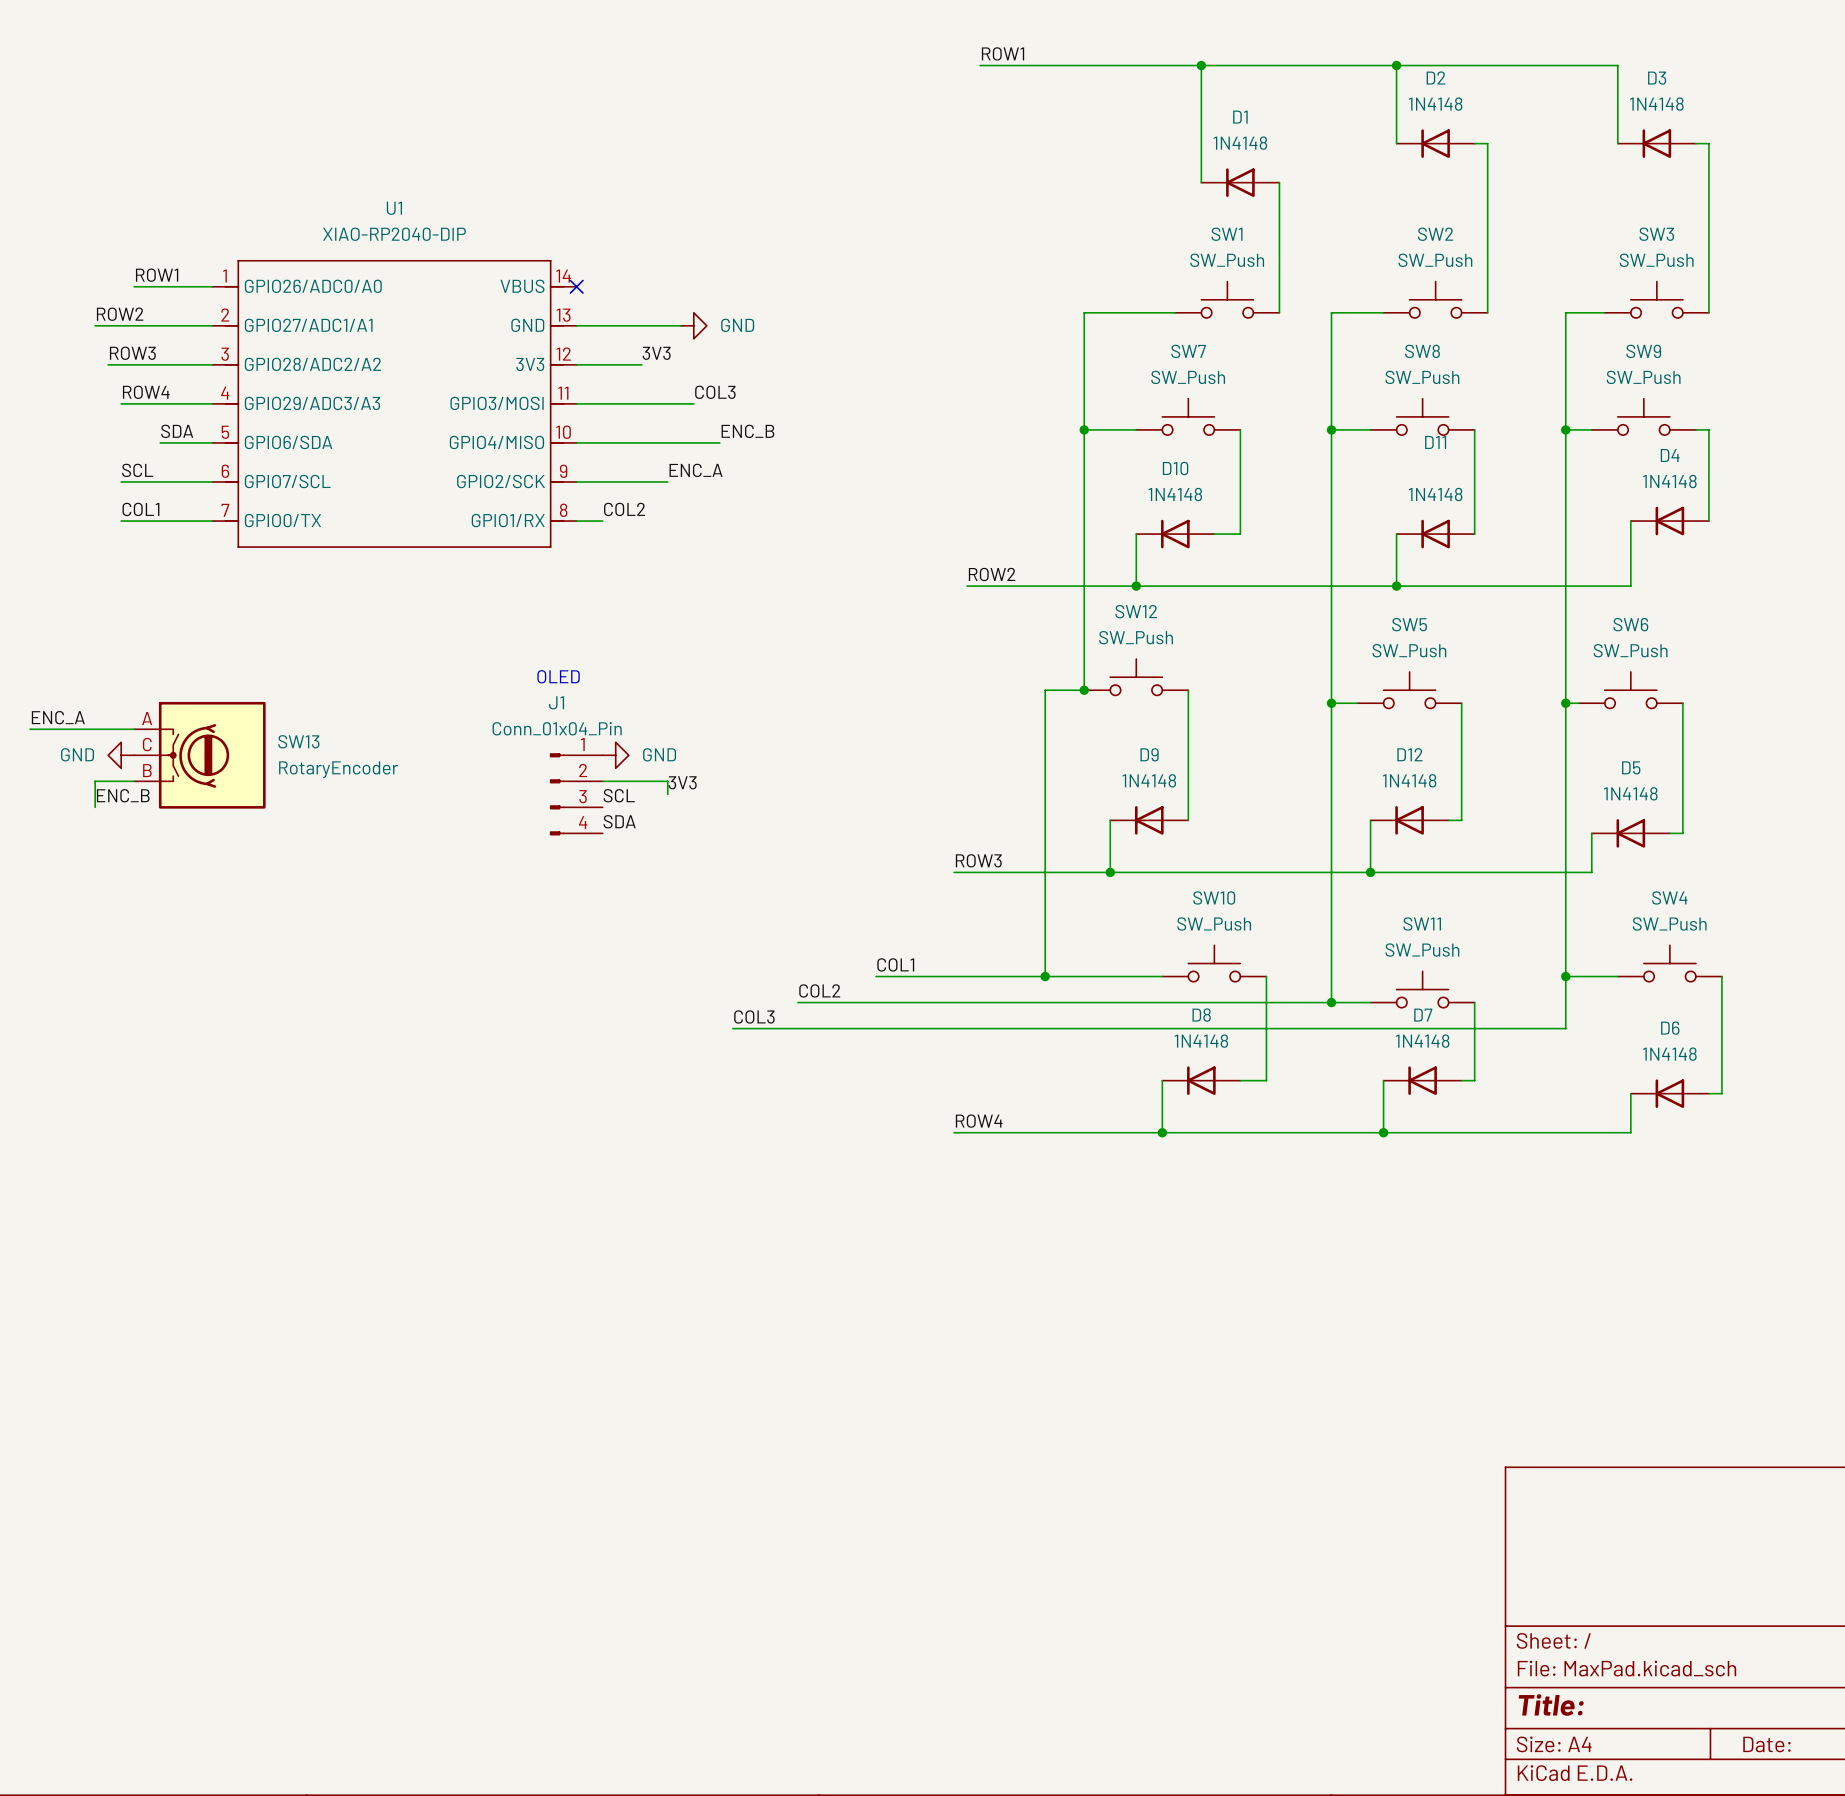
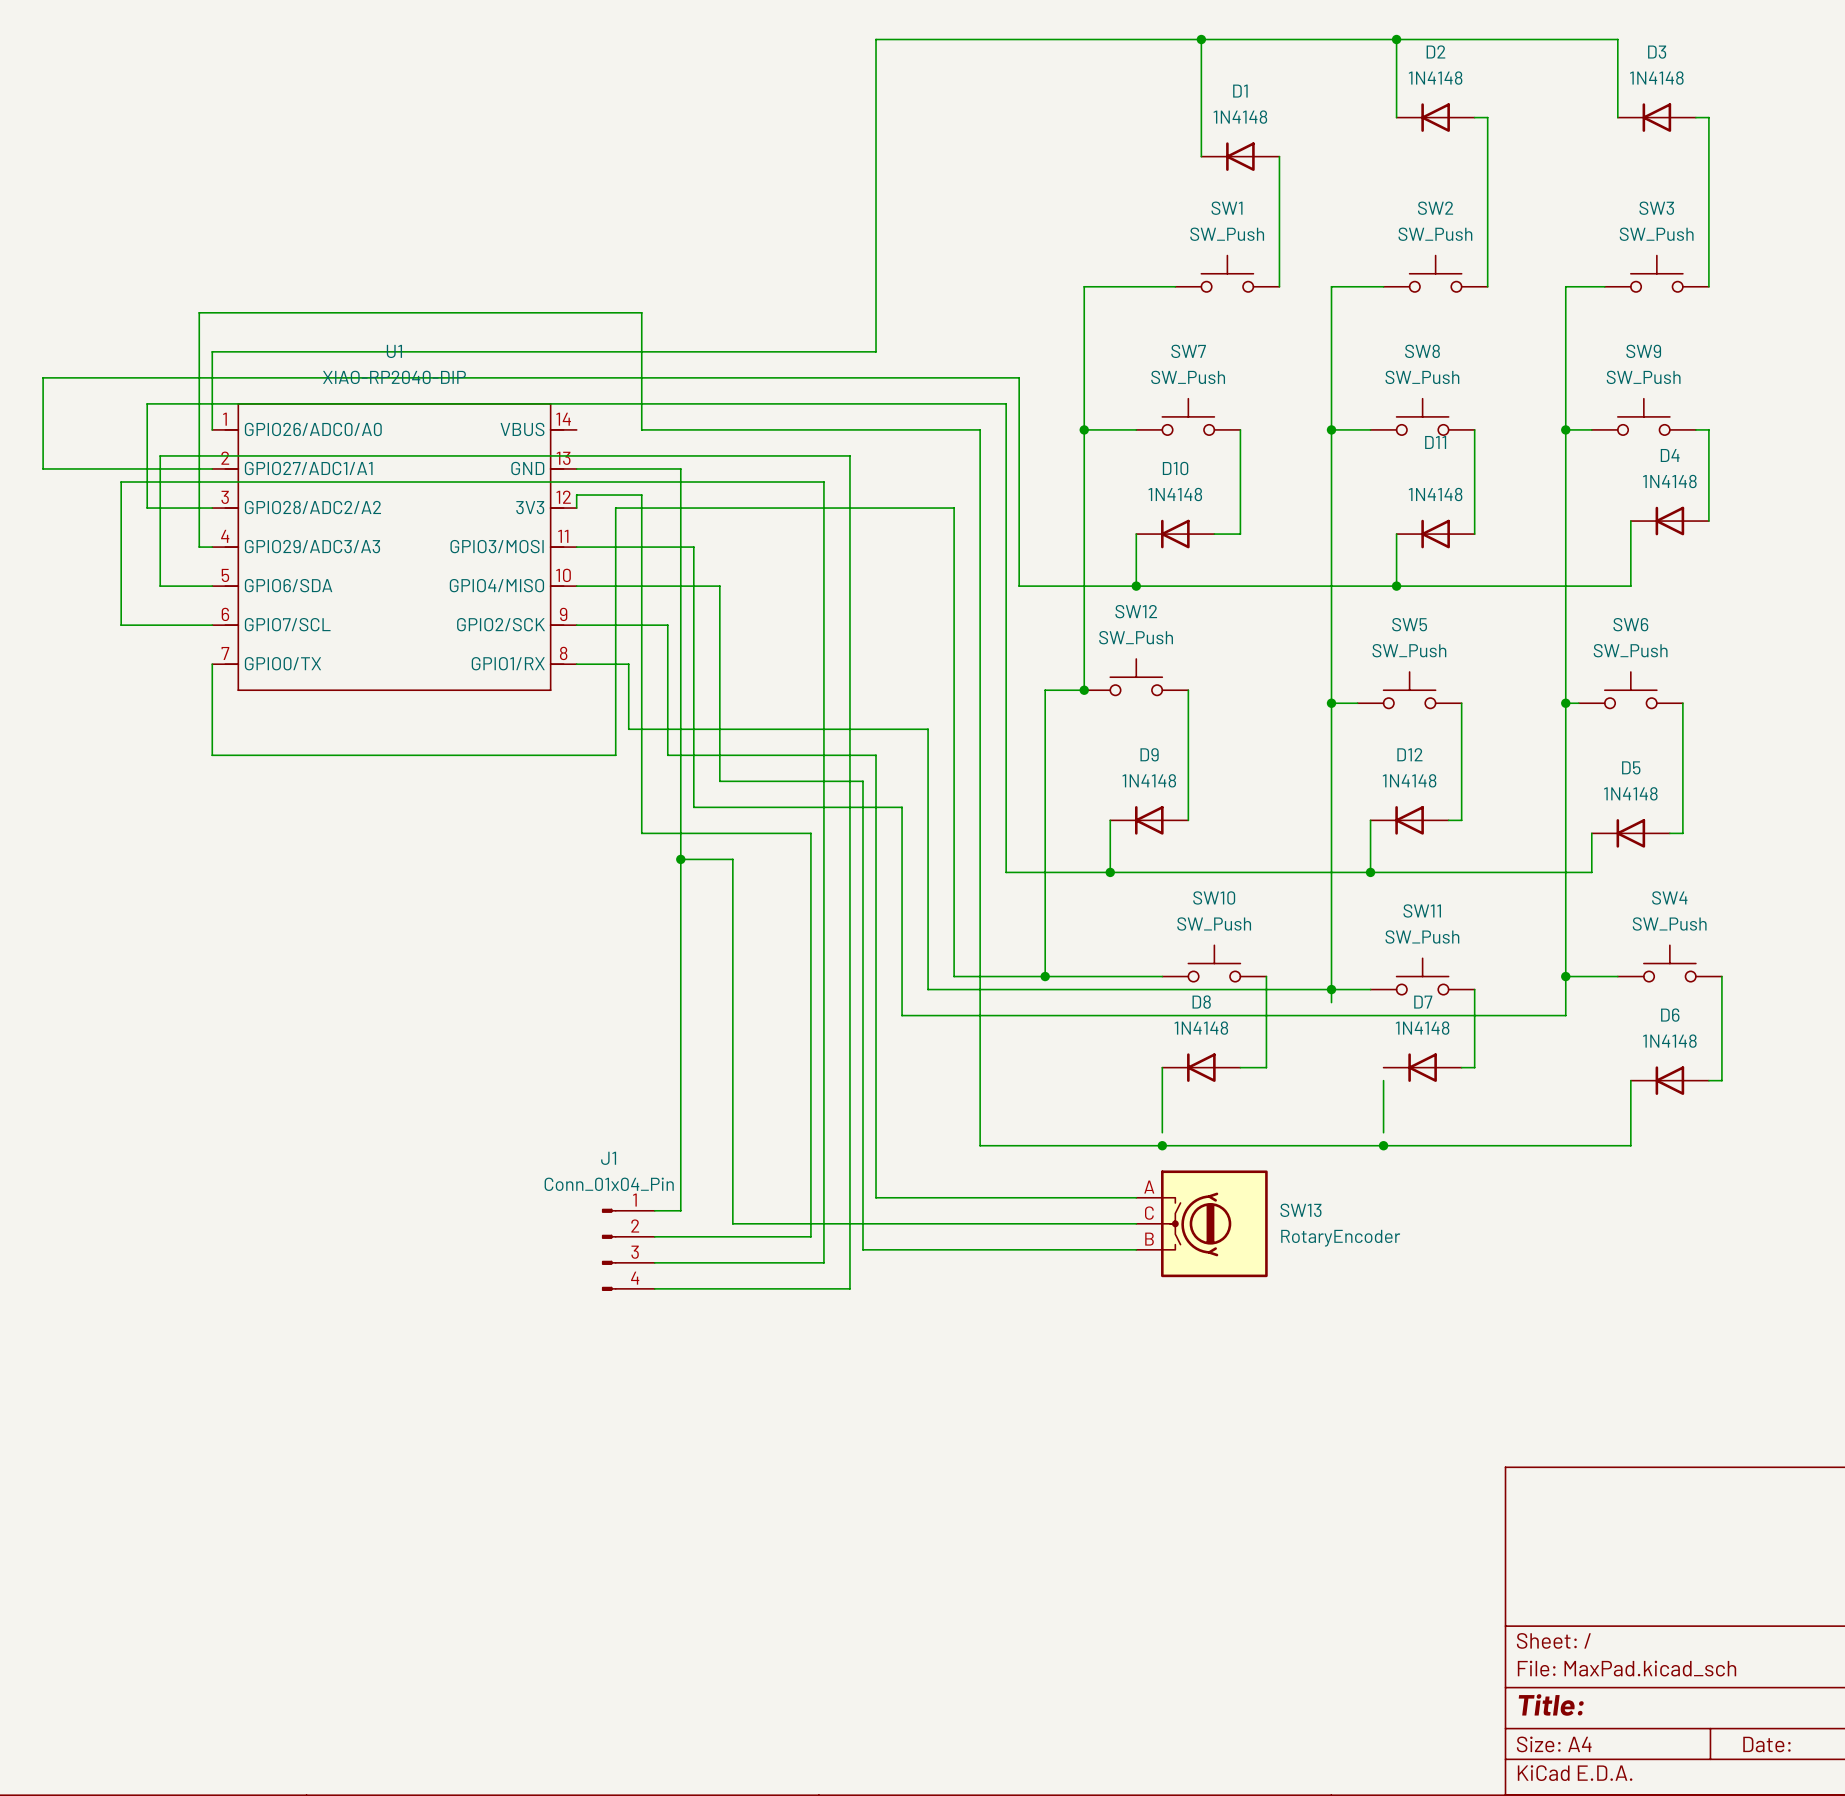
wire: none -> (1201, 39) (1201, 65)
label: ROW1 (1003, 53) -> none
wire: (980, 65) (1617, 65) -> (212, 429) (212, 351) (876, 351) (876, 39) (1617, 39) (1617, 65)
junction position: (1201, 65) -> (1201, 39)
junction position: (1396, 65) -> (1396, 39)
wire: (1396, 117) (1396, 143) -> (1396, 39) (1396, 65)
wire: (1617, 117) (1617, 143) -> none
D2 position: (1435, 143) -> (1435, 117)
wire: (1474, 143) (1487, 143) -> (1474, 117) (1487, 117) (1487, 143)
D3 position: (1656, 143) -> (1656, 117)
wire: (1695, 143) (1708, 143) -> (1695, 117) (1708, 117) (1708, 143)
wire: (1201, 156) (1201, 182) -> (1279, 156) (1279, 182)
D1 position: (1240, 182) -> (1240, 156)
label: ROW1 (157, 275) -> none
wire: (134, 286) (212, 286) -> none
no-connect mark: (576, 286) -> none
wire: (1279, 286) (1279, 312) -> none
wire: (1487, 286) (1487, 312) -> none
wire: (1708, 286) (1708, 312) -> none
SW1 position: (1227, 299) -> (1227, 273)
SW2 position: (1435, 299) -> (1435, 273)
SW3 position: (1656, 299) -> (1656, 273)
wire: (1084, 312) (1175, 312) -> (1084, 312) (1084, 286) (1175, 286)
wire: (1331, 312) (1383, 312) -> (1331, 312) (1331, 286) (1383, 286)
wire: (1565, 312) (1604, 312) -> (1565, 312) (1565, 286) (1604, 286)
label: ROW2 (120, 314) -> none
wire: (95, 325) (212, 325) -> none
wire: (576, 325) (680, 325) -> none
power symbol: GND (693, 325) -> none
label: ROW3 (132, 353) -> none
label: 3V3 (656, 353) -> none
wire: (108, 364) (212, 364) -> none
wire: (576, 364) (641, 364) -> none
label: ROW4 (146, 392) -> none
label: COL3 (715, 392) -> none
wire: (121, 403) (147, 403) -> (212, 508) (147, 508) (147, 403)
wire: none -> (212, 403) (576, 403)
U1 position: (394, 403) -> (394, 547)
label: SDA (177, 431) -> none
label: ENC_B (747, 431) -> none
wire: (160, 442) (212, 442) -> none
wire: (576, 442) (719, 442) -> none
wire: none -> (576, 468) (680, 468) (680, 1210) (654, 1210)
label: SCL (137, 470) -> none
label: ENC_A (696, 470) -> none
wire: none -> (121, 481) (121, 625) (212, 625)
wire: none -> (212, 481) (576, 481)
wire: none -> (667, 481) (823, 481) (823, 1262) (654, 1262)
wire: none -> (576, 508) (576, 495) (641, 495) (641, 833) (810, 833) (810, 1236) (654, 1236)
label: COL1 (140, 509) -> none
label: COL2 (624, 509) -> none
wire: (121, 521) (212, 521) -> none
wire: (576, 521) (602, 521) -> none
label: ROW2 (992, 574) -> none
wire: none -> (212, 586) (160, 586) (160, 455) (849, 455) (849, 1288) (654, 1288)
wire: none -> (576, 586) (719, 586) (719, 781) (862, 781) (862, 1249) (1136, 1249)
wire: (967, 586) (1019, 586) -> (212, 468) (43, 468) (43, 377) (1019, 377) (1019, 586)
wire: none -> (576, 625) (667, 625) (667, 755) (876, 755) (876, 1197) (1136, 1197)
wire: none -> (576, 664) (628, 664) (628, 729) (928, 729) (928, 989) (1370, 989)
text: OLED (558, 676) -> none
label: ENC_A (58, 717) -> none
wire: (30, 729) (134, 729) -> none
power symbol: GND (121, 755) -> none
SW13 position: (199, 755) -> (1202, 1223)
power symbol: GND (615, 755) -> none
wire: (134, 781) (95, 781) (95, 807) -> none
wire: (602, 781) (667, 781) (667, 794) -> none
label: 3V3 (682, 782) -> none
J1 position: (576, 794) -> (628, 1249)
label: ENC_B (123, 795) -> none
label: SCL (619, 795) -> none
label: SDA (619, 821) -> none
wire: none -> (680, 859) (732, 859) (732, 1223) (1136, 1223)
junction: none -> (680, 859)
label: ROW3 (978, 860) -> none
wire: (954, 872) (1006, 872) -> (693, 403) (1006, 403) (1006, 872)
label: COL1 (895, 964) -> none
wire: (876, 976) (954, 976) -> (212, 664) (212, 755) (615, 755) (615, 508) (954, 508) (954, 976)
SW11 position: (1422, 989) -> (1422, 976)
wire: none -> (1474, 989) (1474, 1002)
label: COL2 (819, 990) -> none
wire: (797, 1002) (1370, 1002) -> none
junction position: (1331, 1002) -> (1331, 989)
wire: (1565, 1015) (1565, 1028) (732, 1028) -> (1565, 1015) (902, 1015) (902, 807) (693, 807) (693, 547) (576, 547)
label: COL3 (754, 1016) -> none
wire: none -> (1162, 1067) (1162, 1080)
wire: (1266, 1067) (1266, 1080) (1240, 1080) -> (1266, 1067) (1240, 1067)
wire: (1474, 1067) (1474, 1080) (1461, 1080) -> (1474, 1067) (1461, 1067)
D8 position: (1201, 1080) -> (1201, 1067)
D7 position: (1422, 1080) -> (1422, 1067)
wire: none -> (1630, 1080) (1630, 1093)
wire: (1721, 1080) (1721, 1093) (1708, 1093) -> (1721, 1080) (1708, 1080)
D6 position: (1669, 1093) -> (1669, 1080)
label: ROW4 (979, 1121) -> none
wire: (954, 1132) (1630, 1132) -> (212, 547) (199, 547) (199, 312) (641, 312) (641, 429) (980, 429) (980, 1145) (1630, 1145) (1630, 1132)
junction position: (1162, 1132) -> (1162, 1145)
junction position: (1383, 1132) -> (1383, 1145)

